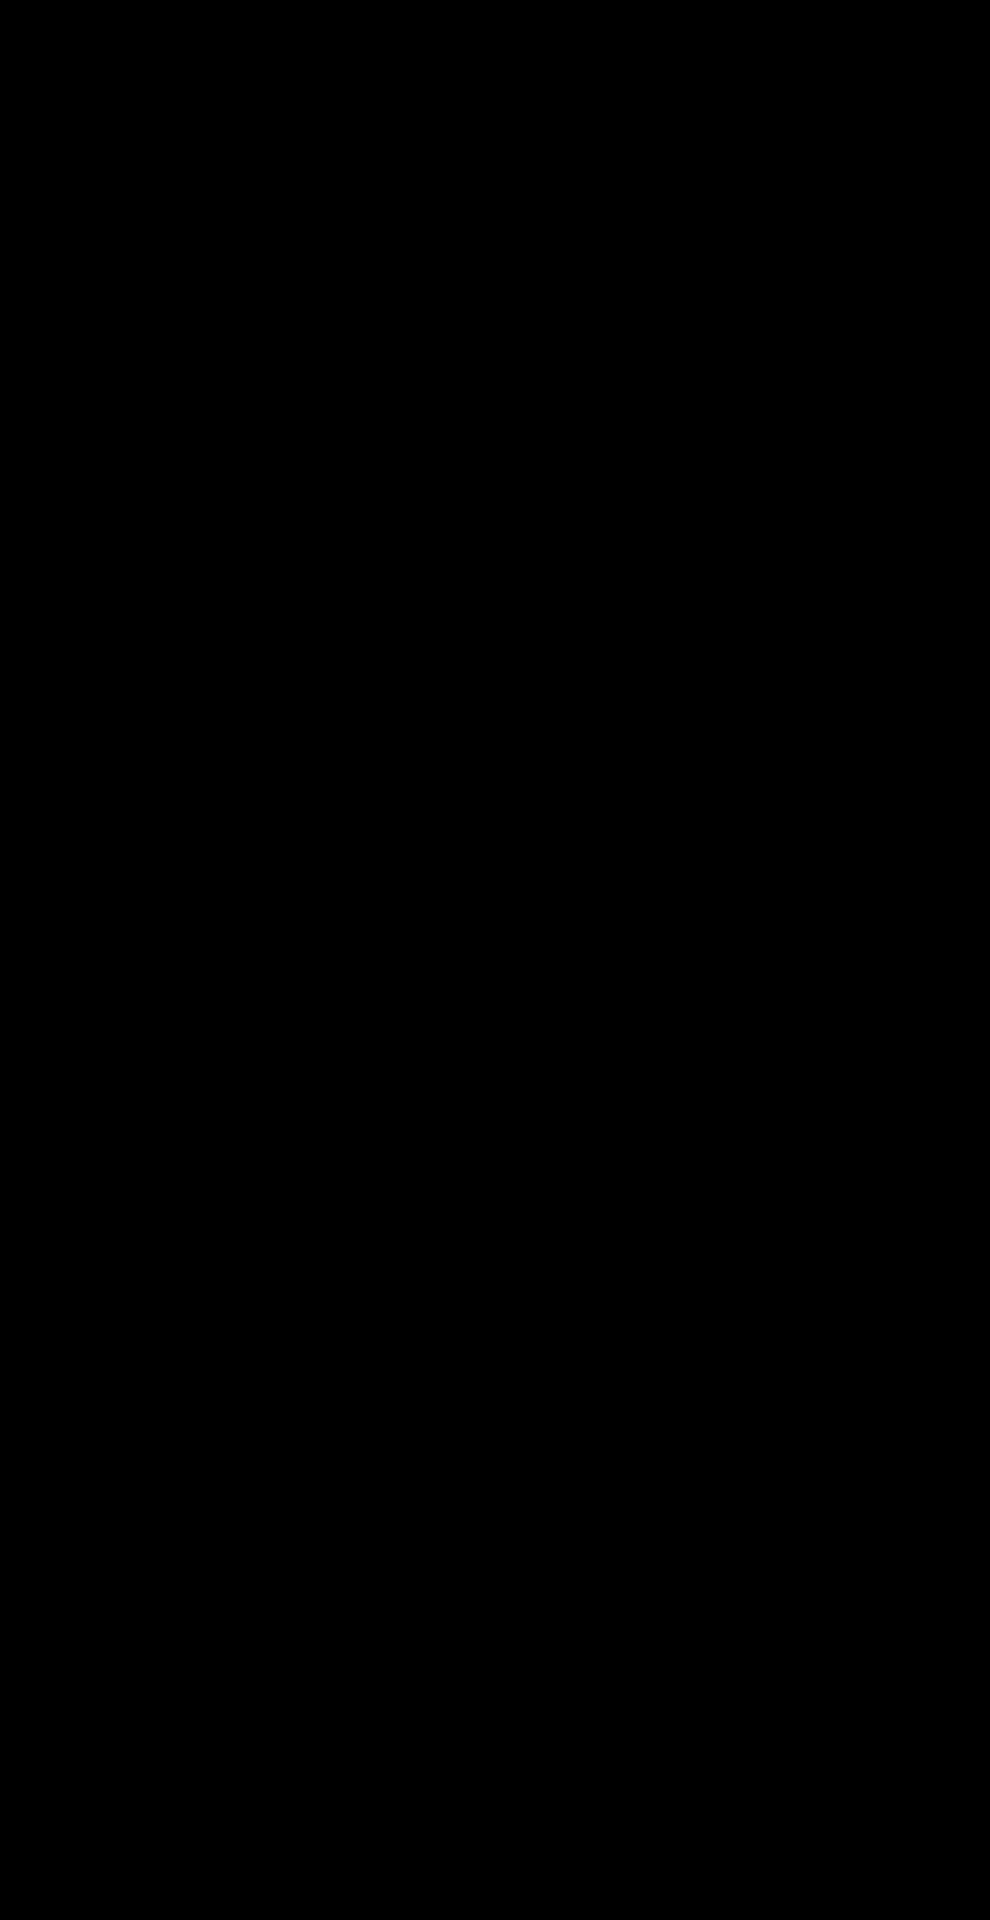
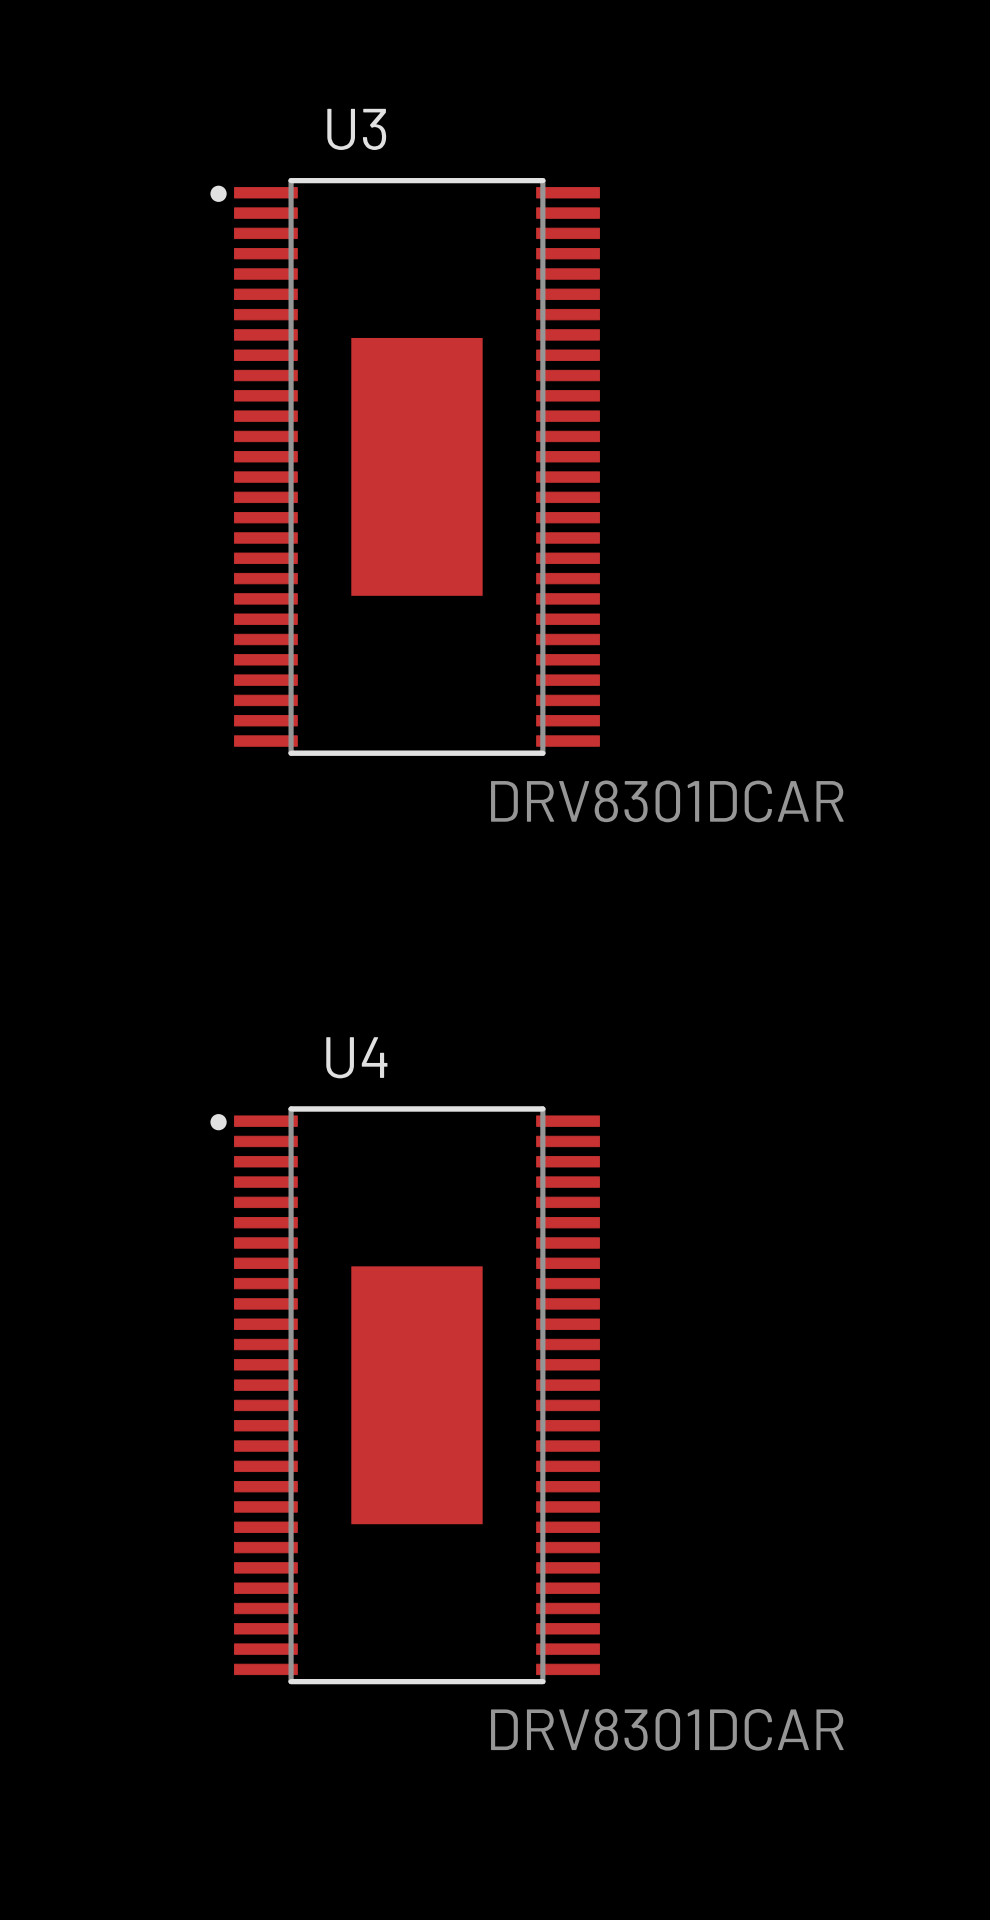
U3: none -> DRV8301DCAR (405, 466)
U4: none -> DRV8301DCAR (405, 1395)

